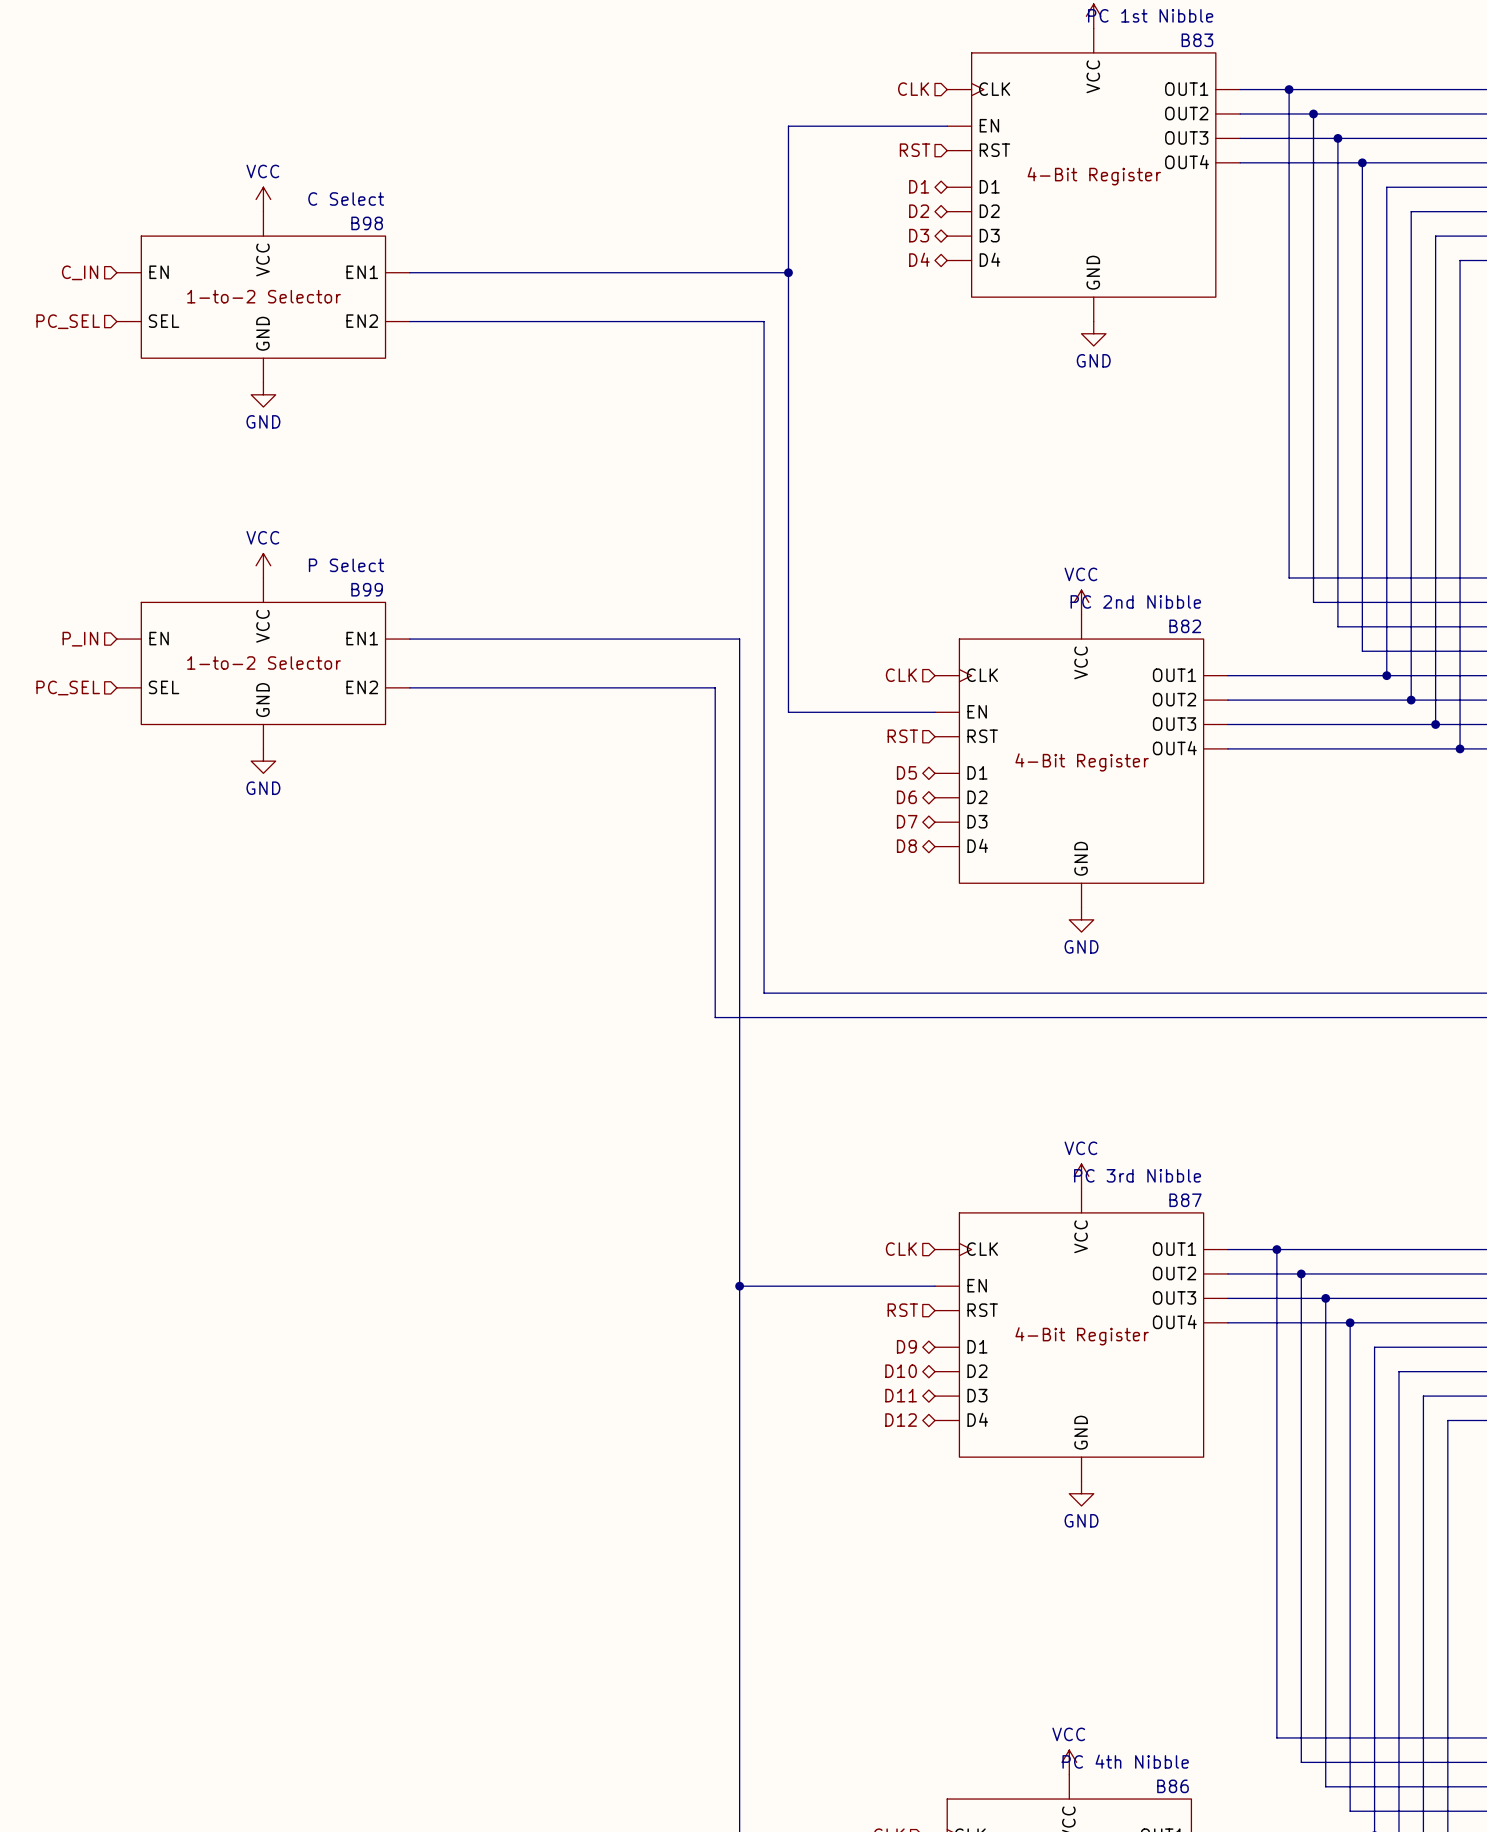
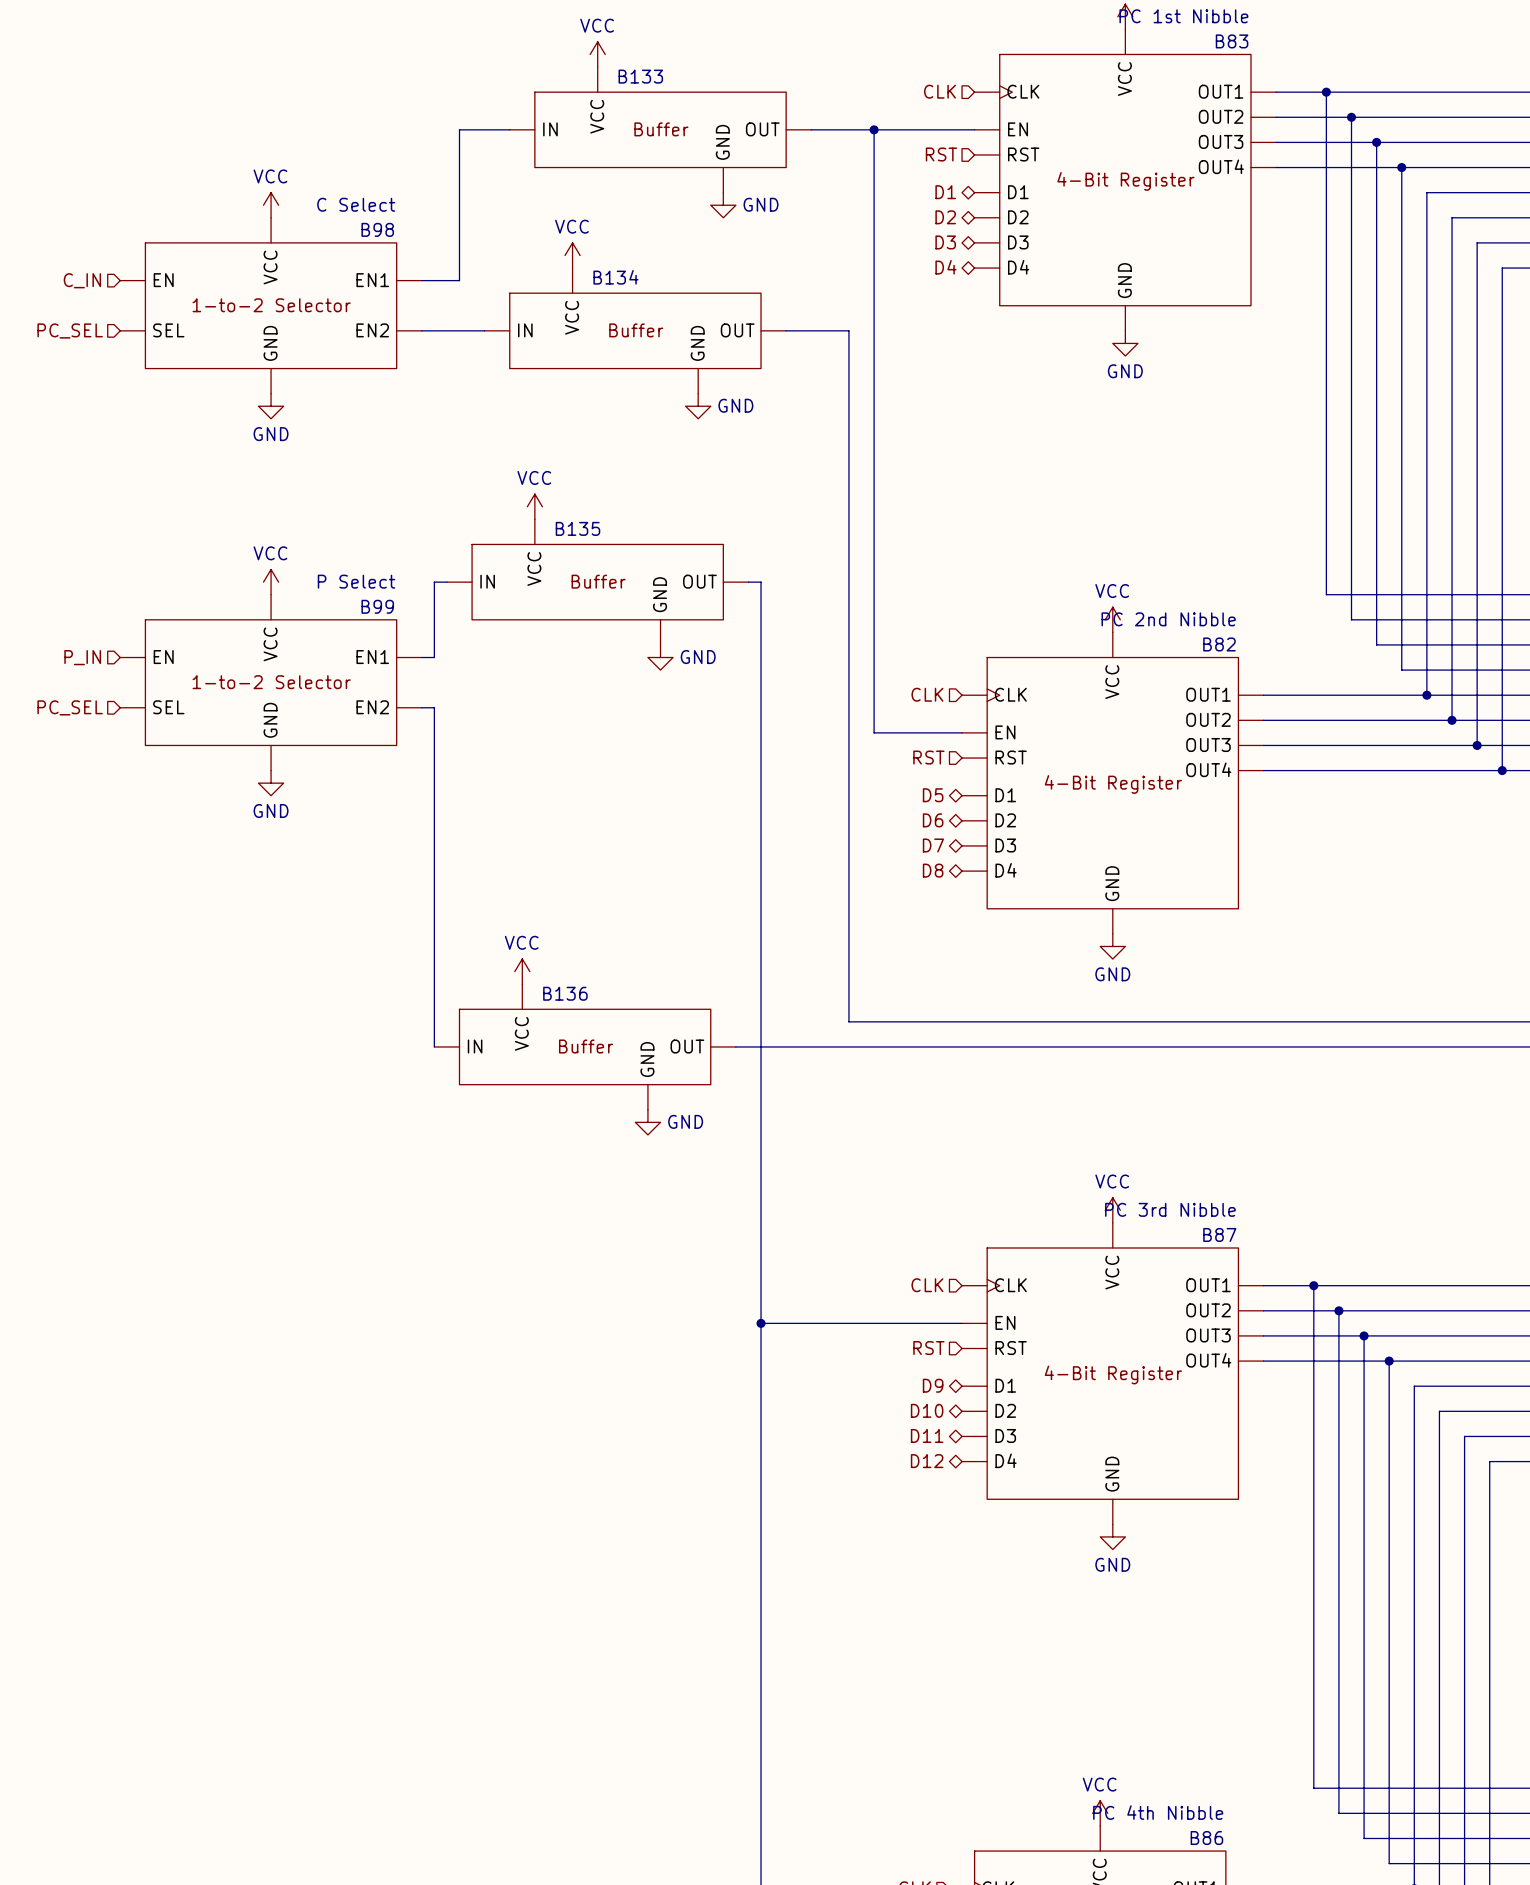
power symbol: none -> VCC (597, 54)
B133: none -> (660, 129)
wire: (788, 126) (788, 712) (849, 712) -> (874, 129) (874, 732)
junction: none -> (874, 129)
power symbol: none -> GND (723, 205)
power symbol: none -> VCC (572, 255)
wire: (446, 272) (788, 272) -> (459, 280) (459, 129) (509, 129)
junction: (788, 272) -> none
wire: (471, 321) (764, 321) (764, 993) (825, 993) -> (786, 330) (848, 330) (848, 1021)
B134: none -> (635, 330)
power symbol: none -> GND (698, 406)
power symbol: none -> VCC (534, 506)
B135: none -> (597, 582)
wire: none -> (748, 582) (761, 582) (761, 657)
wire: (422, 639) (739, 639) -> (434, 657) (434, 582) (446, 582)
power symbol: none -> GND (660, 657)
wire: (422, 687) (715, 687) (715, 1017) -> (434, 707) (434, 1046)
power symbol: none -> VCC (522, 971)
B136: none -> (585, 1046)
power symbol: none -> GND (647, 1122)

